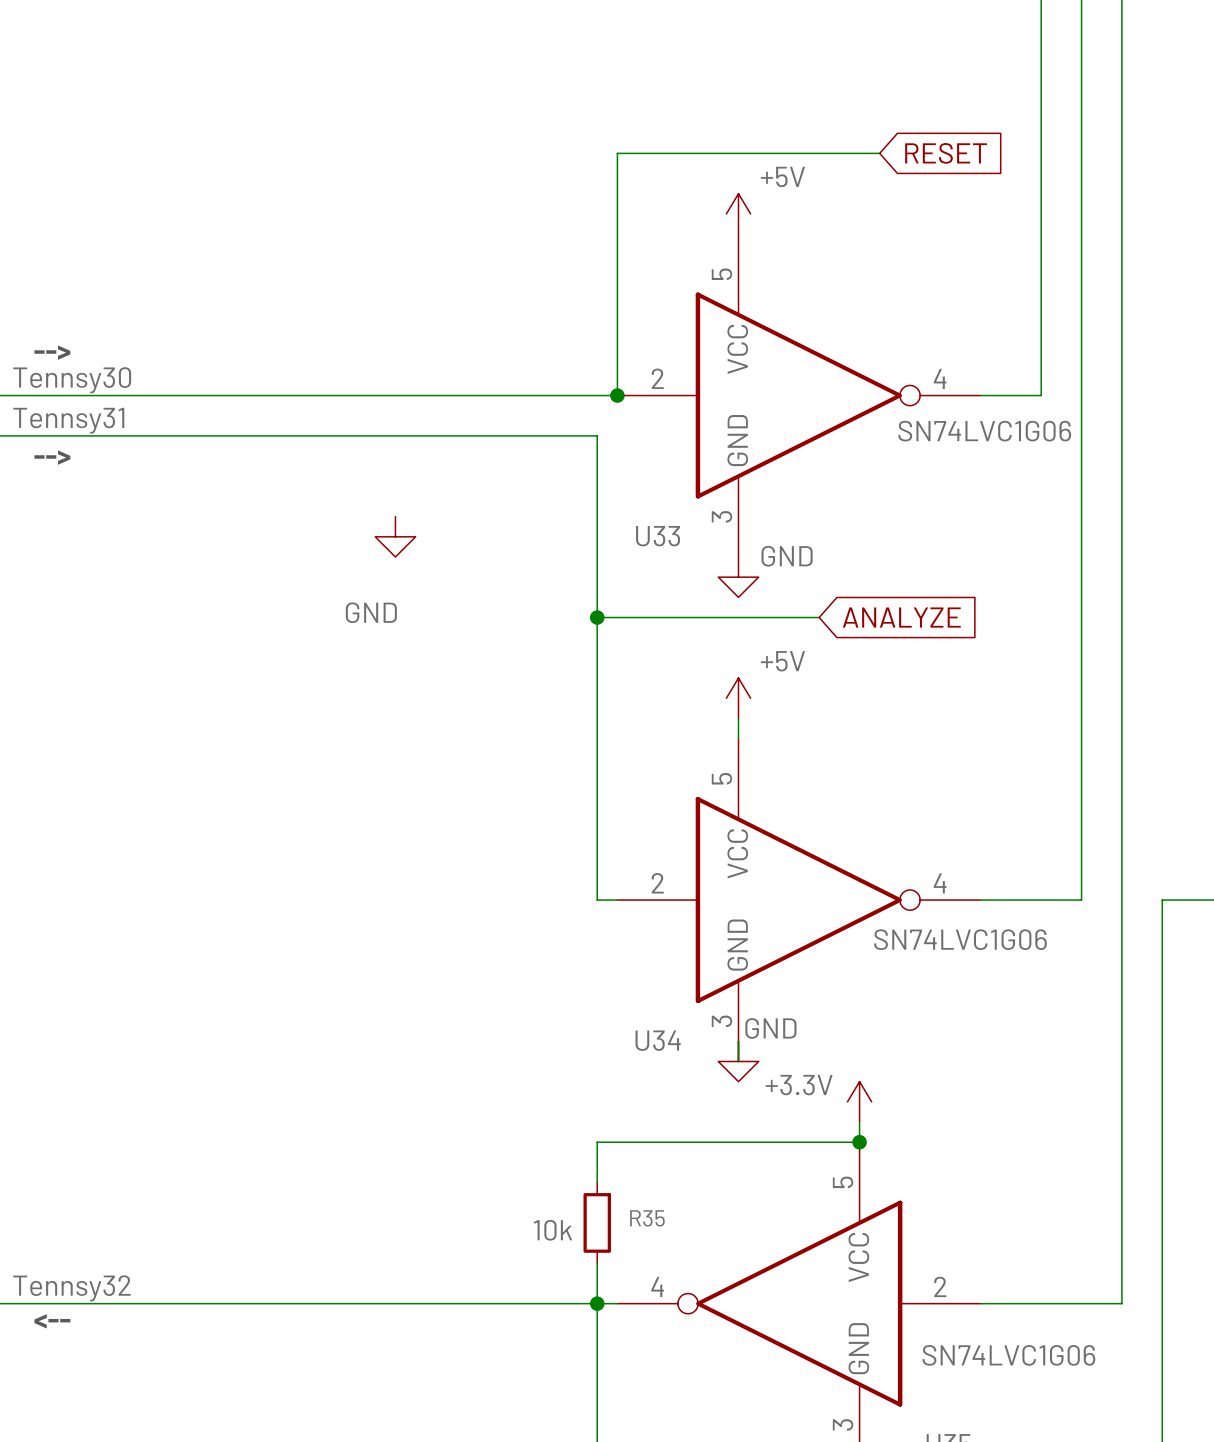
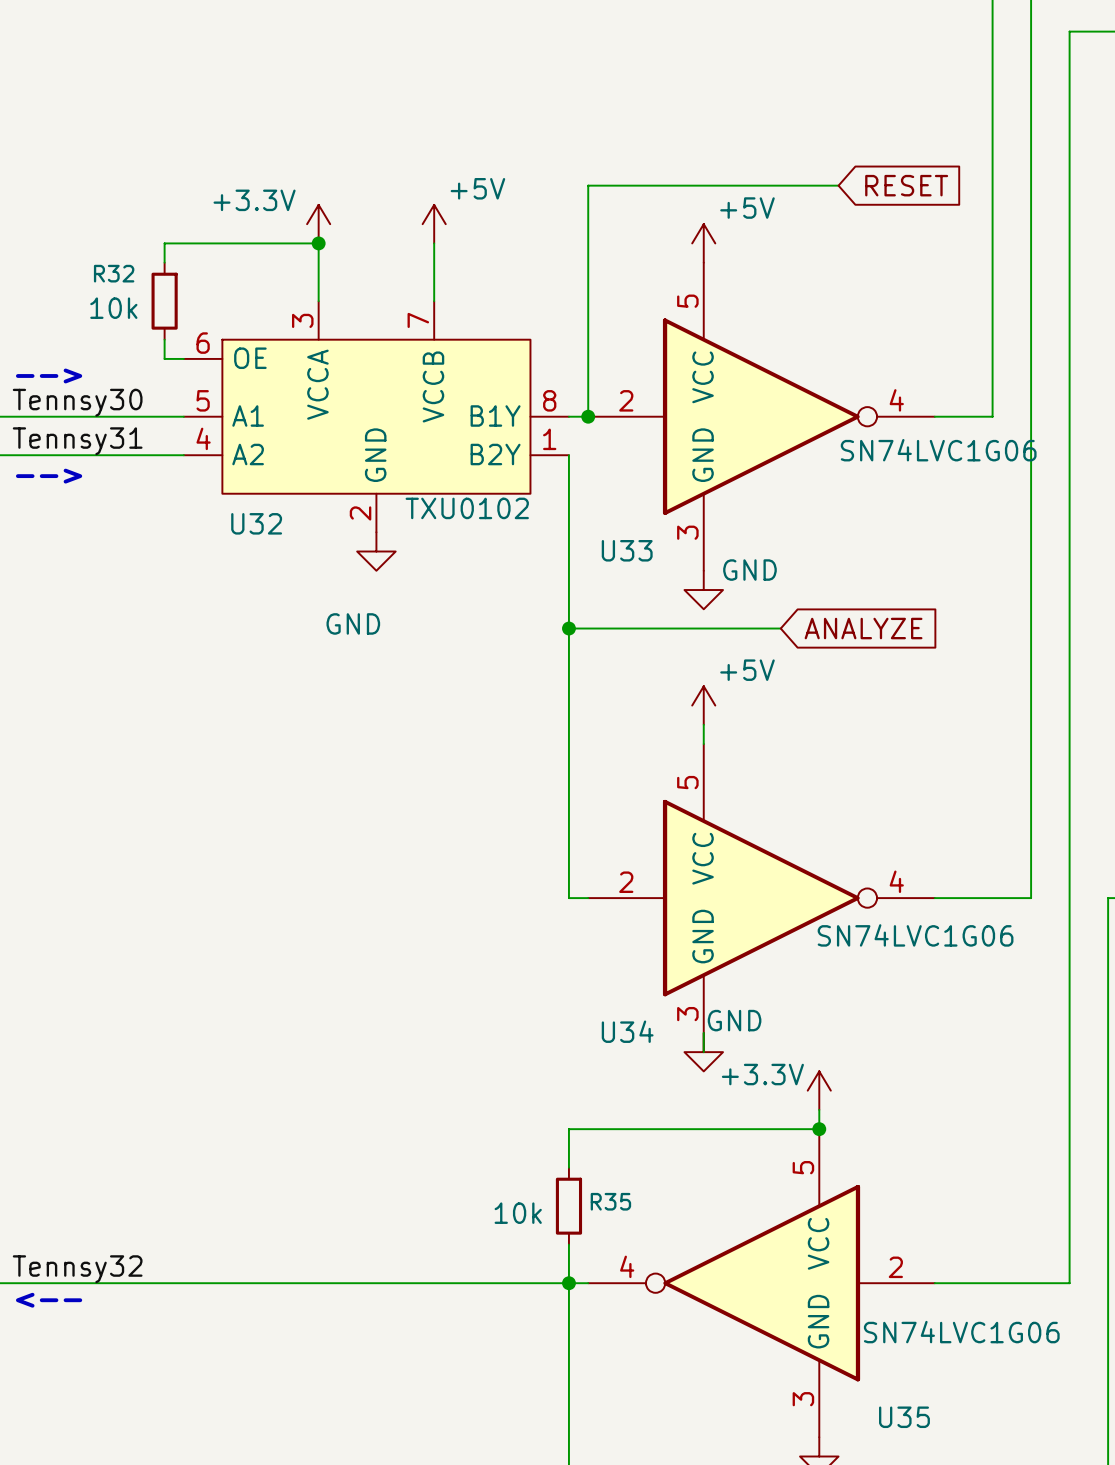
power symbol: none -> +3.3V (318, 224)
power symbol: none -> +5V (434, 224)
junction: none -> (318, 243)
wire: none -> (434, 243) (434, 301)
wire: none -> (164, 262) (164, 243) (318, 243) (318, 301)
R32: none -> 10k (164, 301)
wire: none -> (164, 339) (164, 358) (183, 358)
U32: none -> TXU0102 (376, 416)

